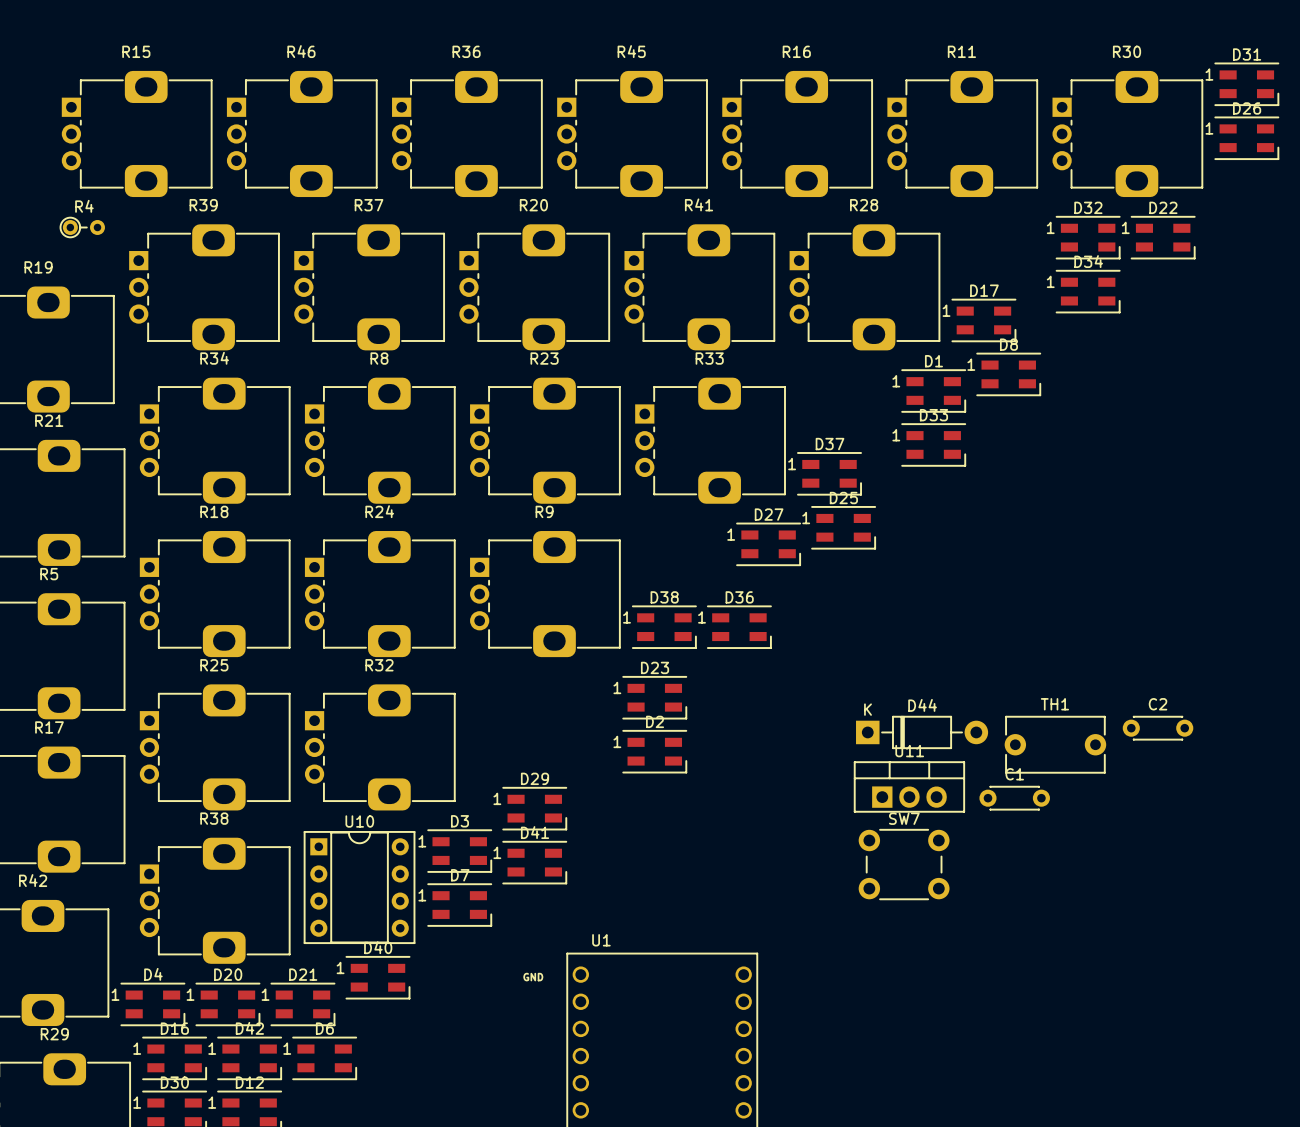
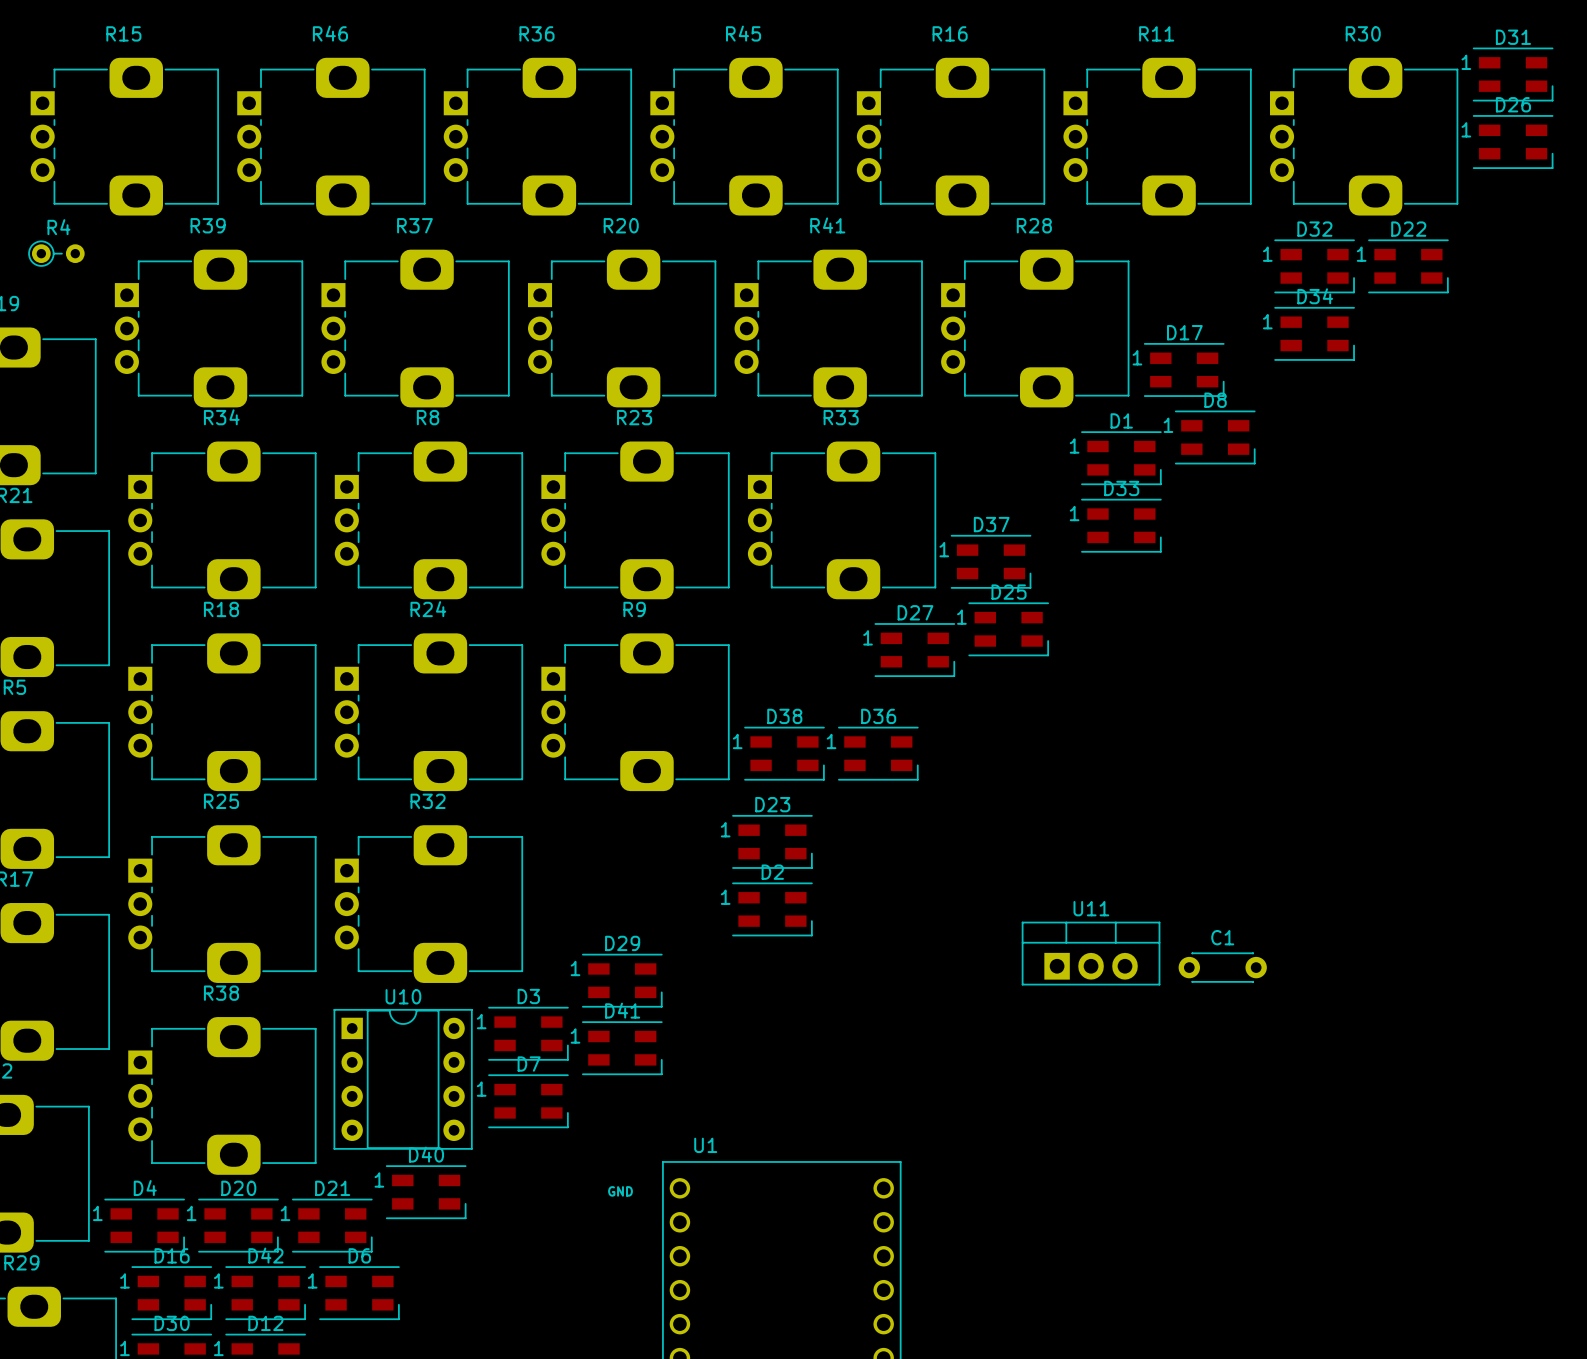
C2: (1158, 728) -> none
D44: (922, 732) -> none
TH1: (1055, 744) -> none
SW7: (904, 864) -> none

